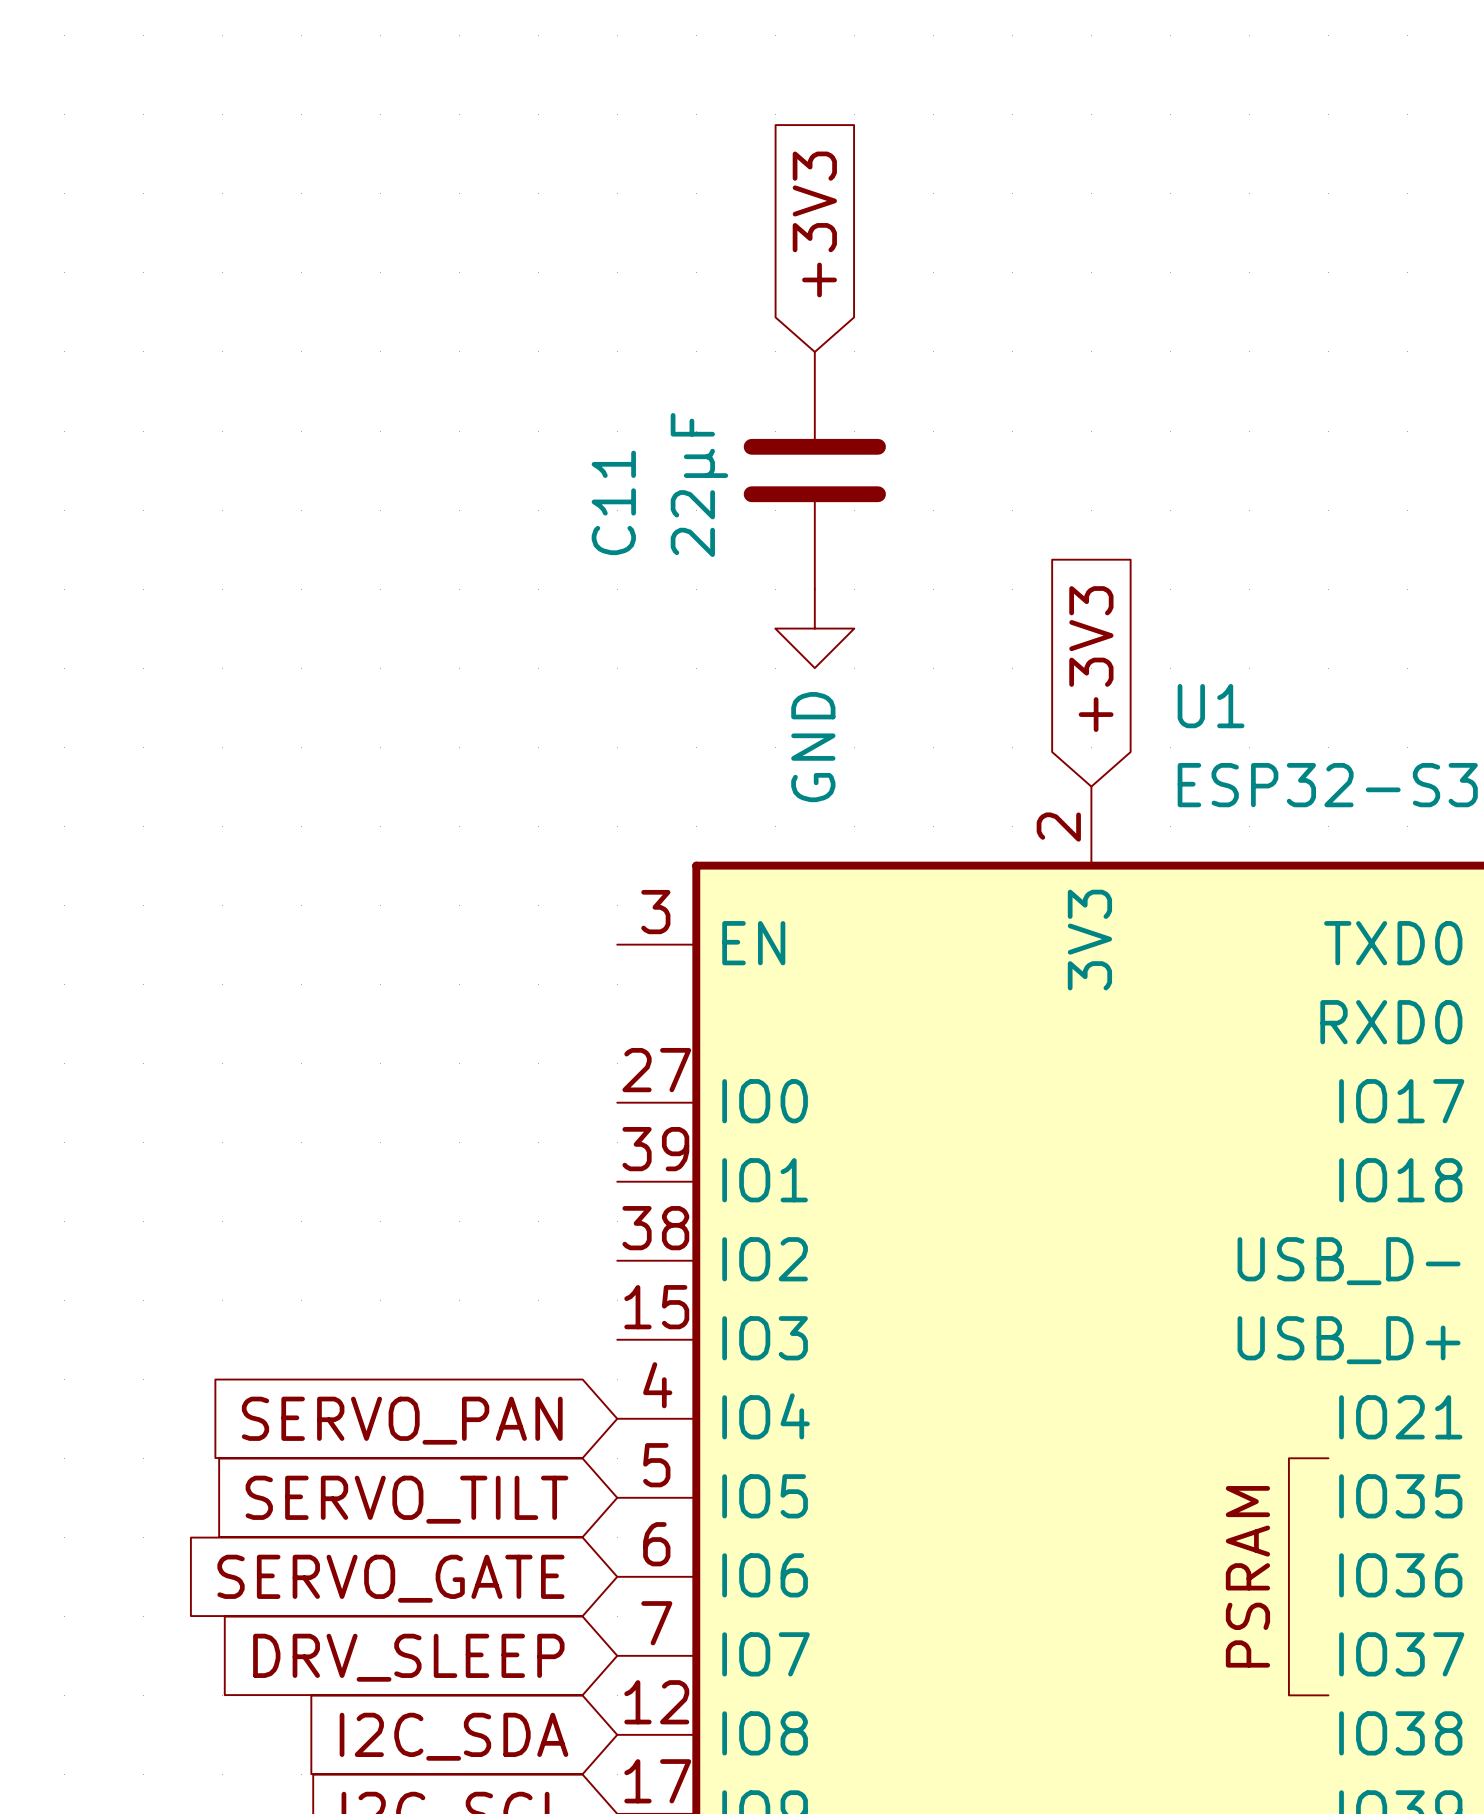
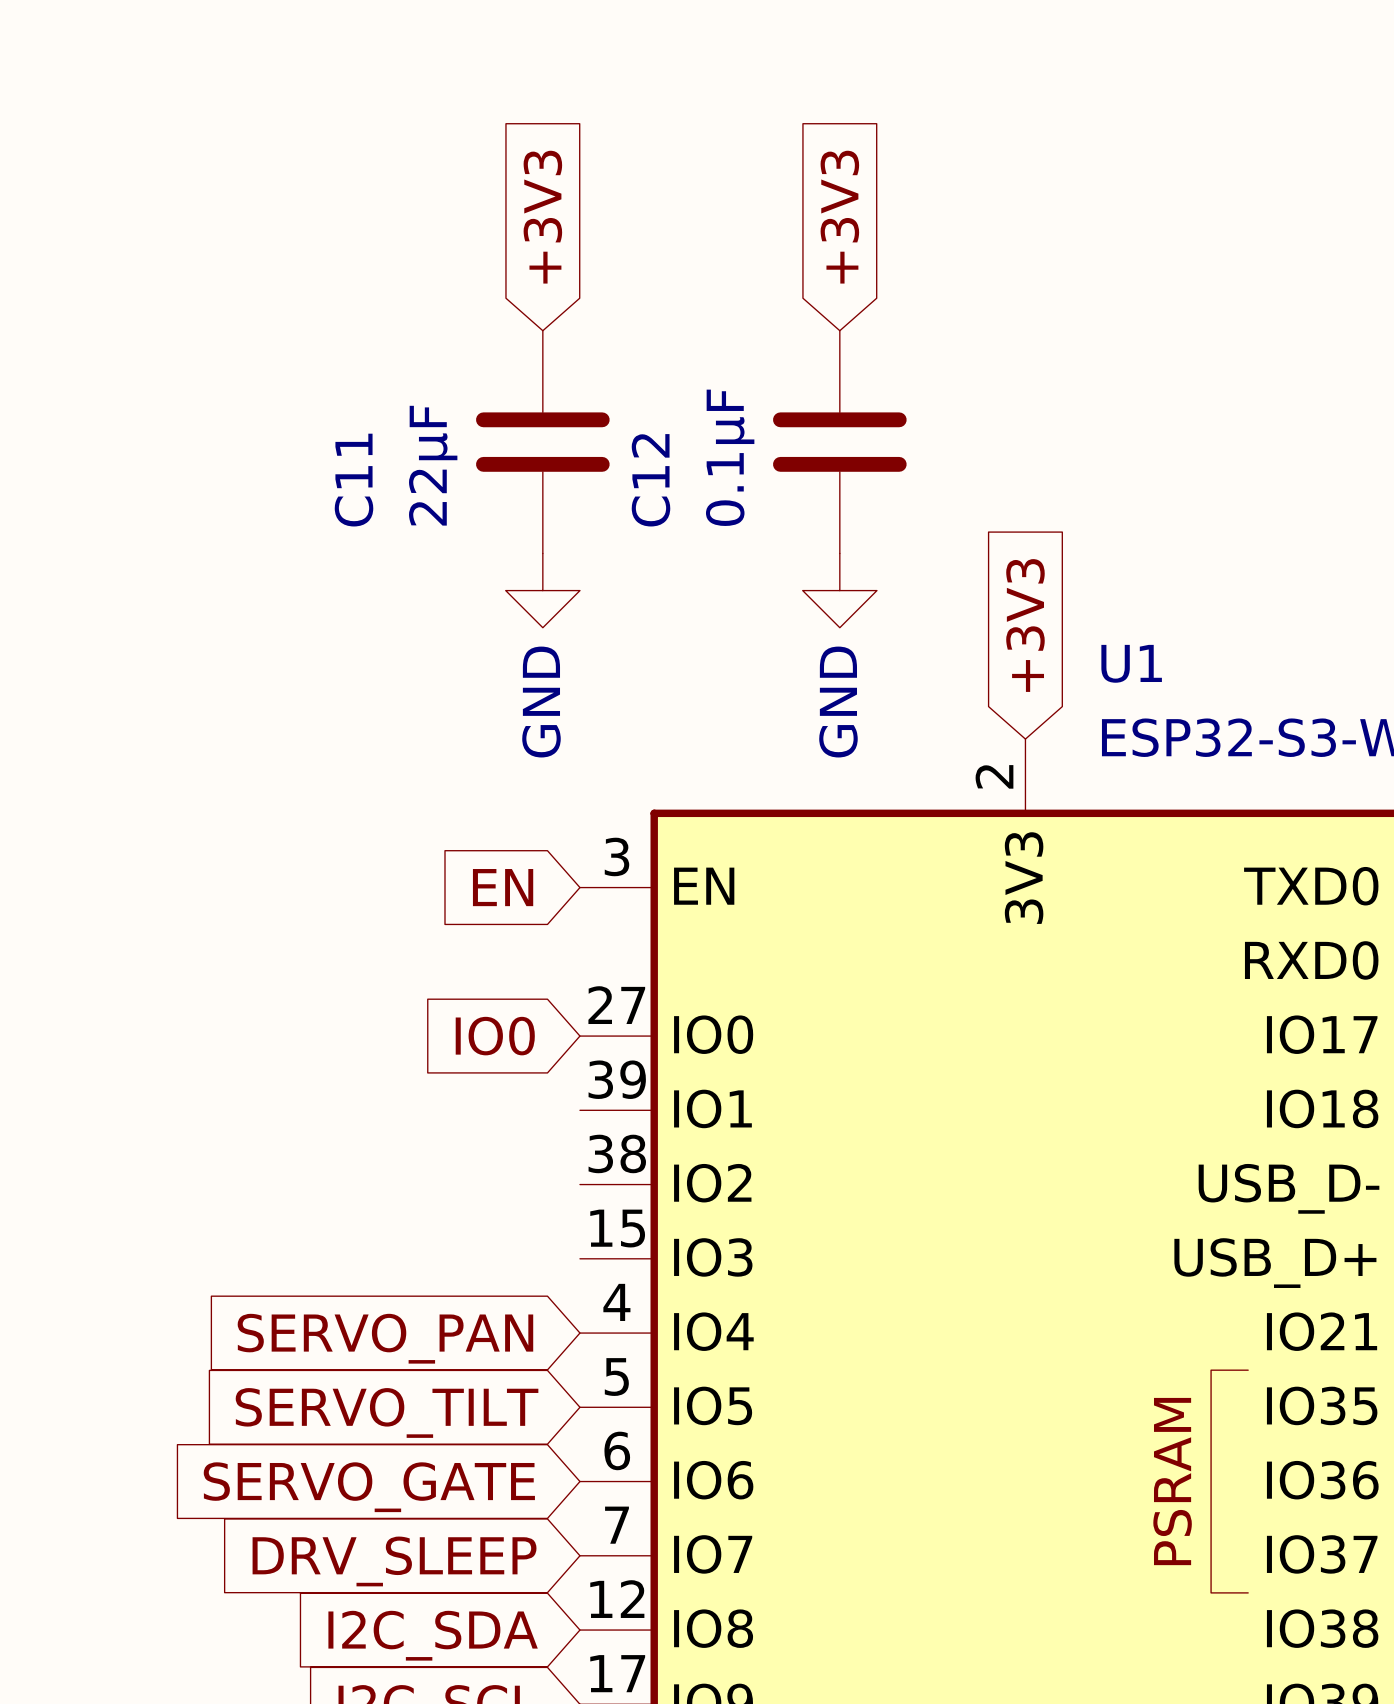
global label: none -> +3V3 (542, 217)
global label position: +3V3 (814, 224) -> +3V3 (839, 217)
C11 position: (814, 470) -> (542, 442)
C12: none -> 0.1µF (839, 442)
power symbol: none -> GND (542, 590)
power symbol position: GND (814, 628) -> GND (839, 590)
global label: none -> EN (503, 887)
global label: none -> IO0 (495, 1036)

